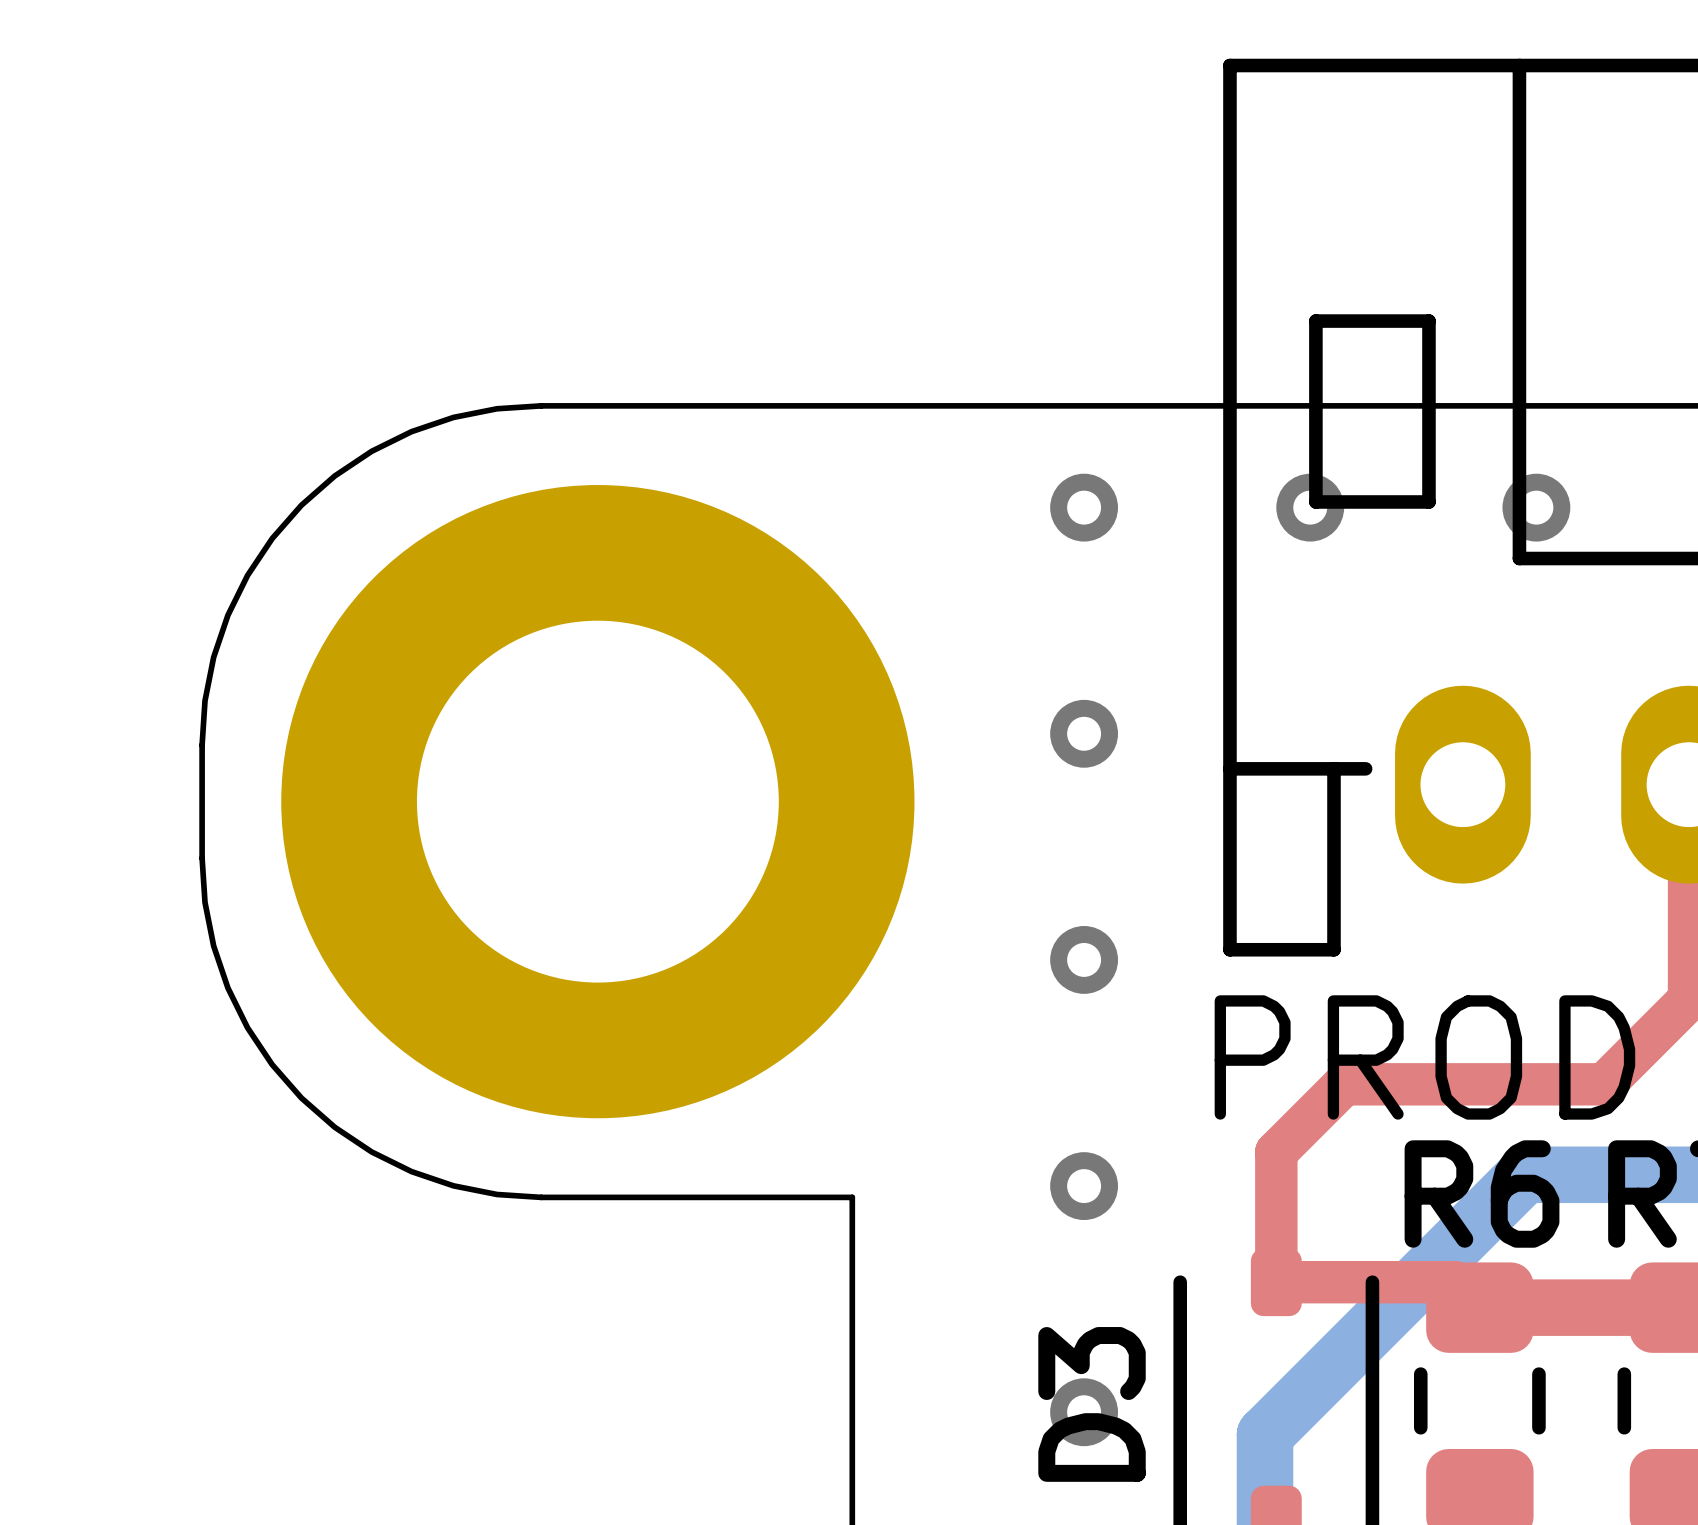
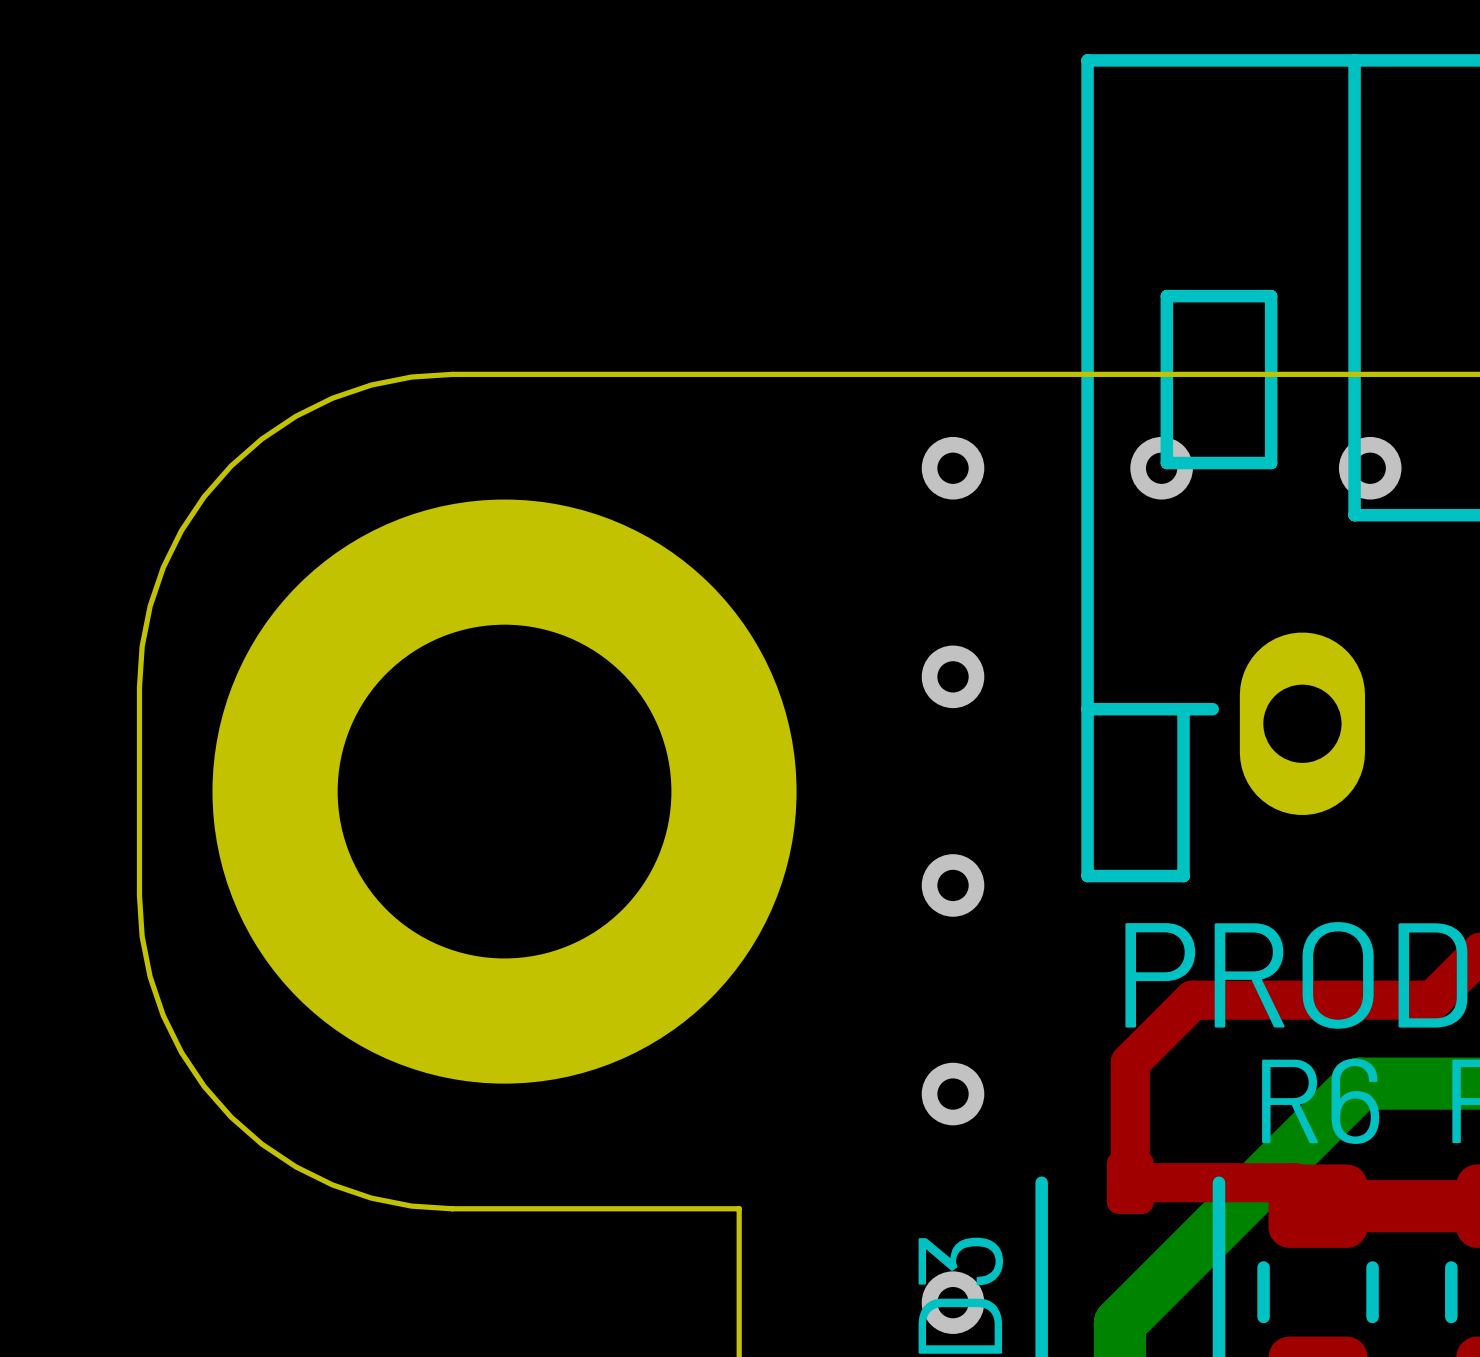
part position: (597, 801) -> (504, 791)
board edge: (202, 858) (205, 902) (213, 945) (227, 987) (247, 1027) (272, 1064) (301, 1098) (334, 1127) (371, 1151) (411, 1171) (453, 1185) (497, 1194) (541, 1197) (852, 1197) (852, 1310) -> (139, 791) (139, 895) (142, 936) (150, 976) (163, 1015) (181, 1052) (204, 1086) (231, 1117) (261, 1144) (295, 1166) (332, 1184) (371, 1198) (411, 1206) (452, 1208) (739, 1208)

